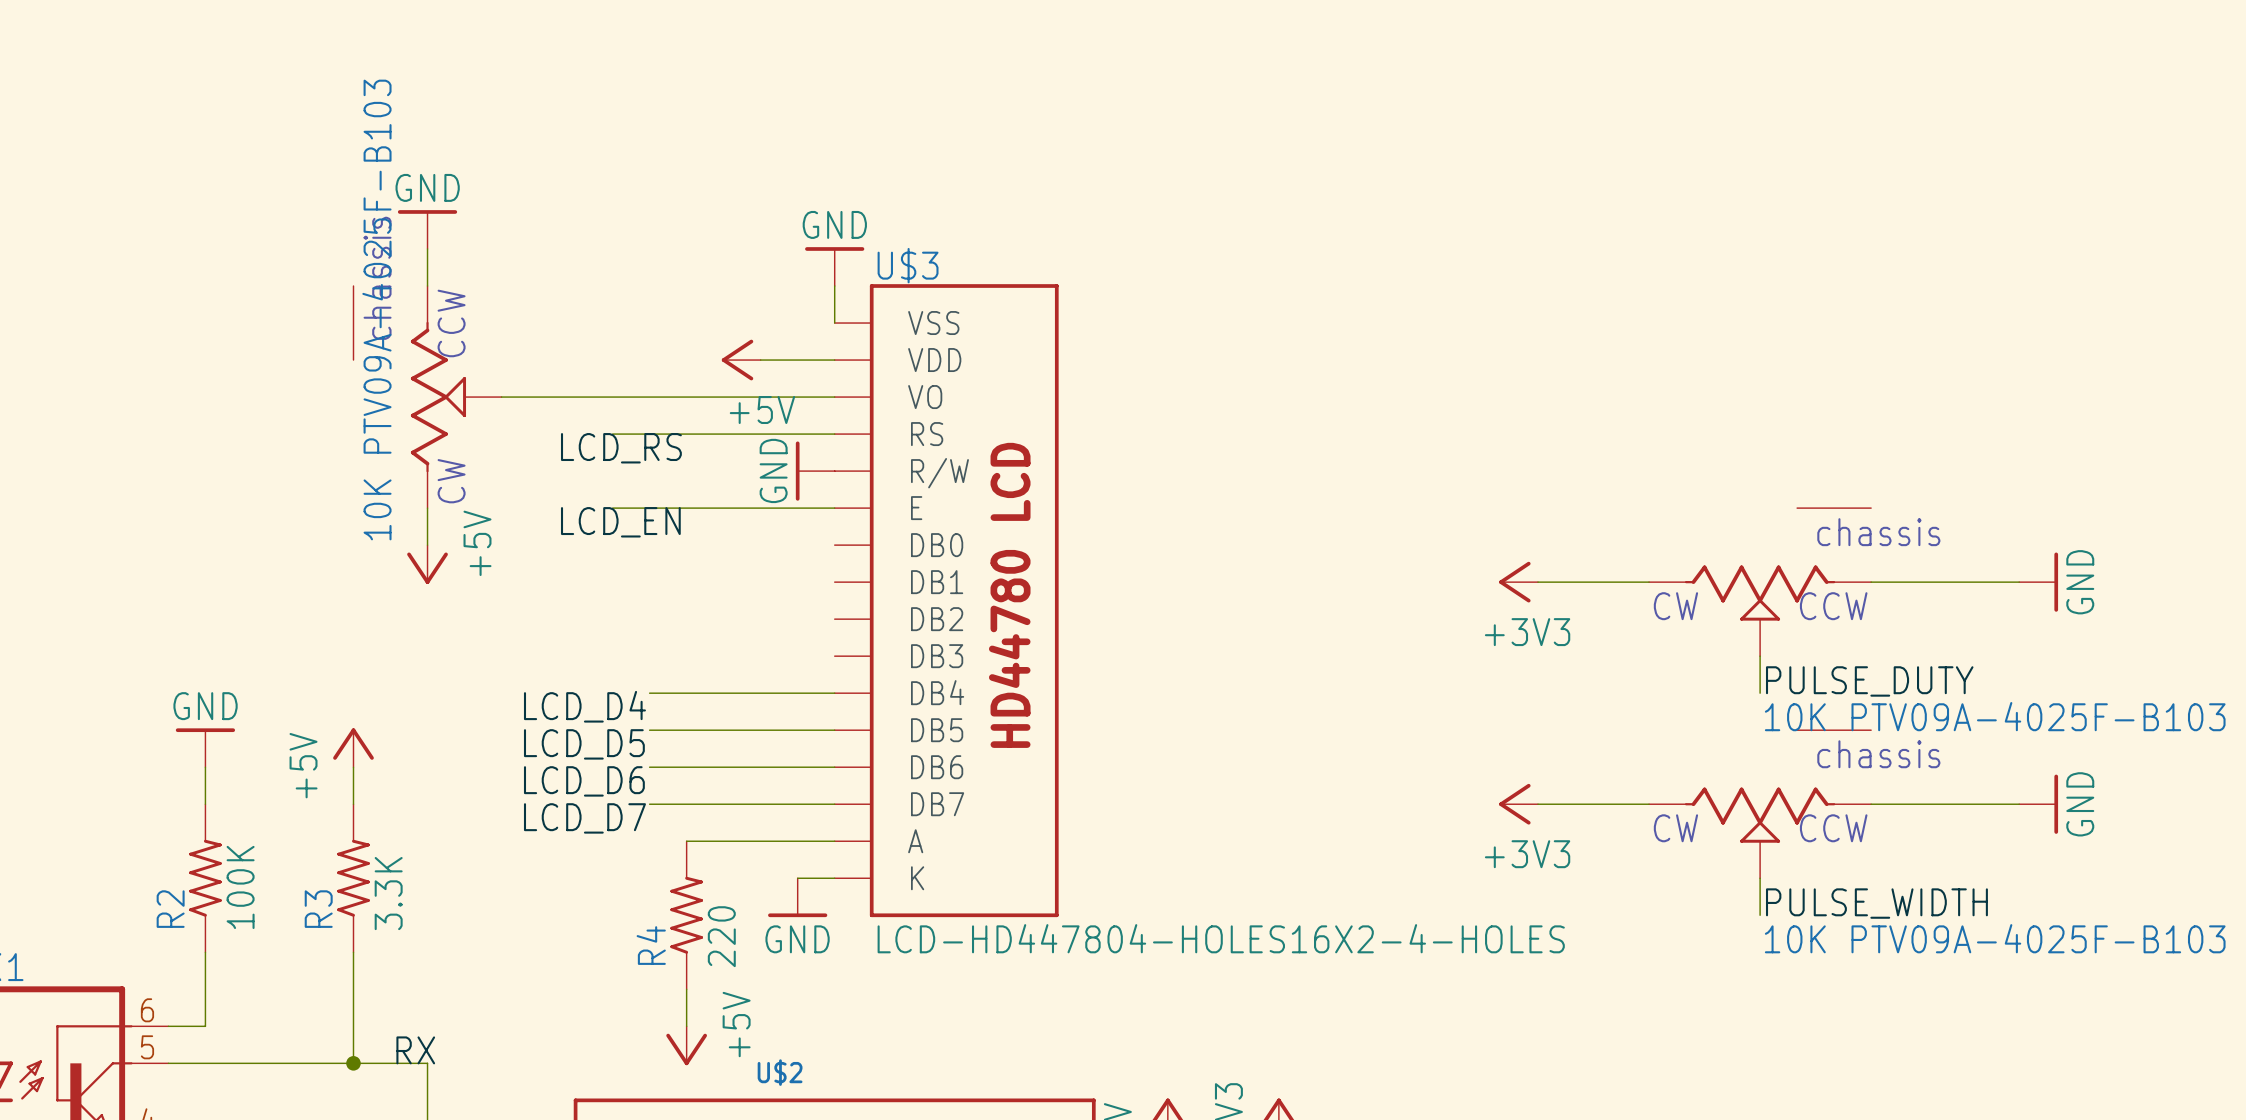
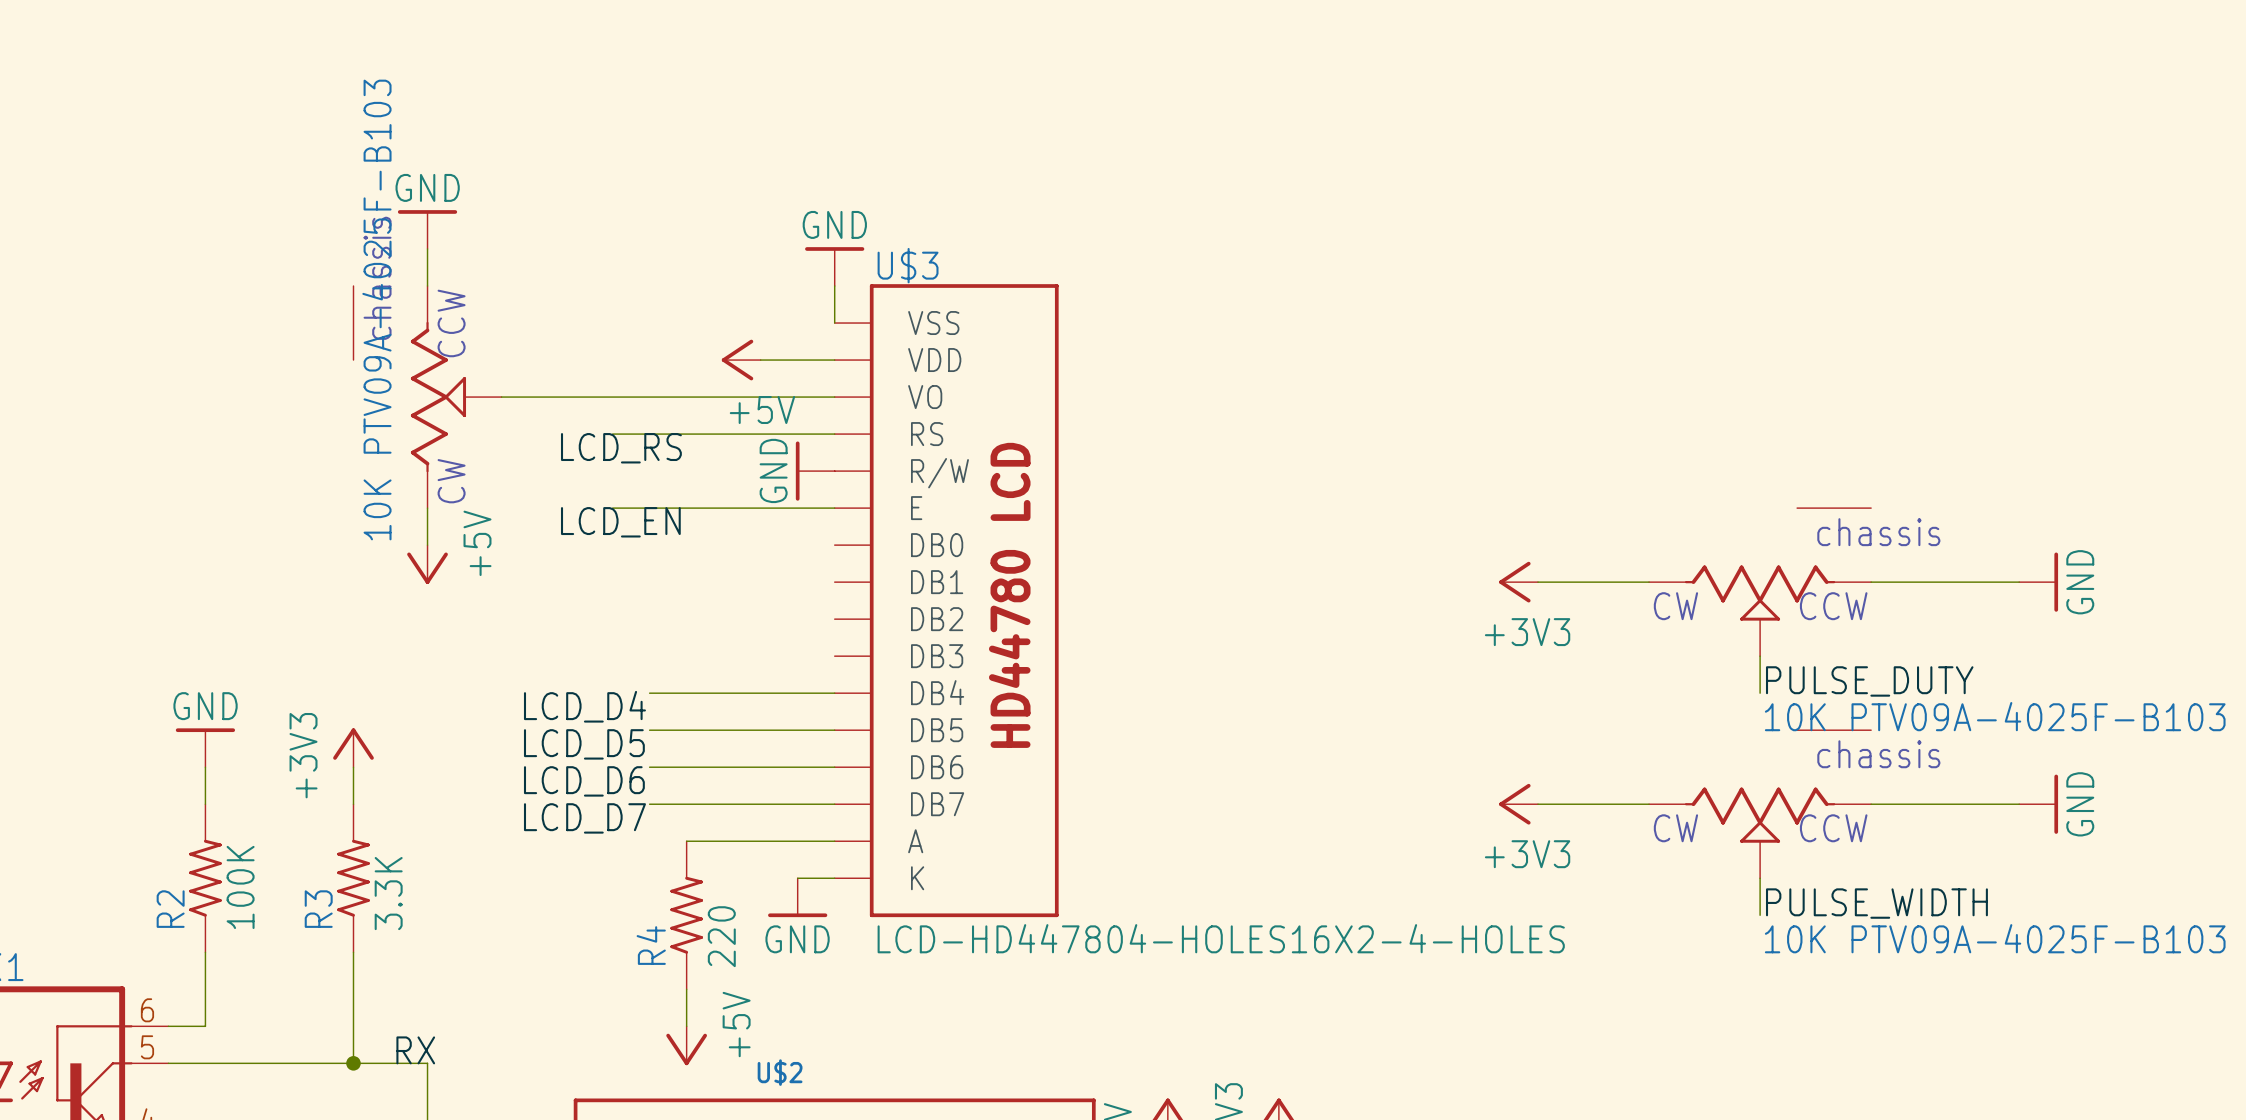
power symbol: +5V (353, 747) -> +3V3 (353, 747)

